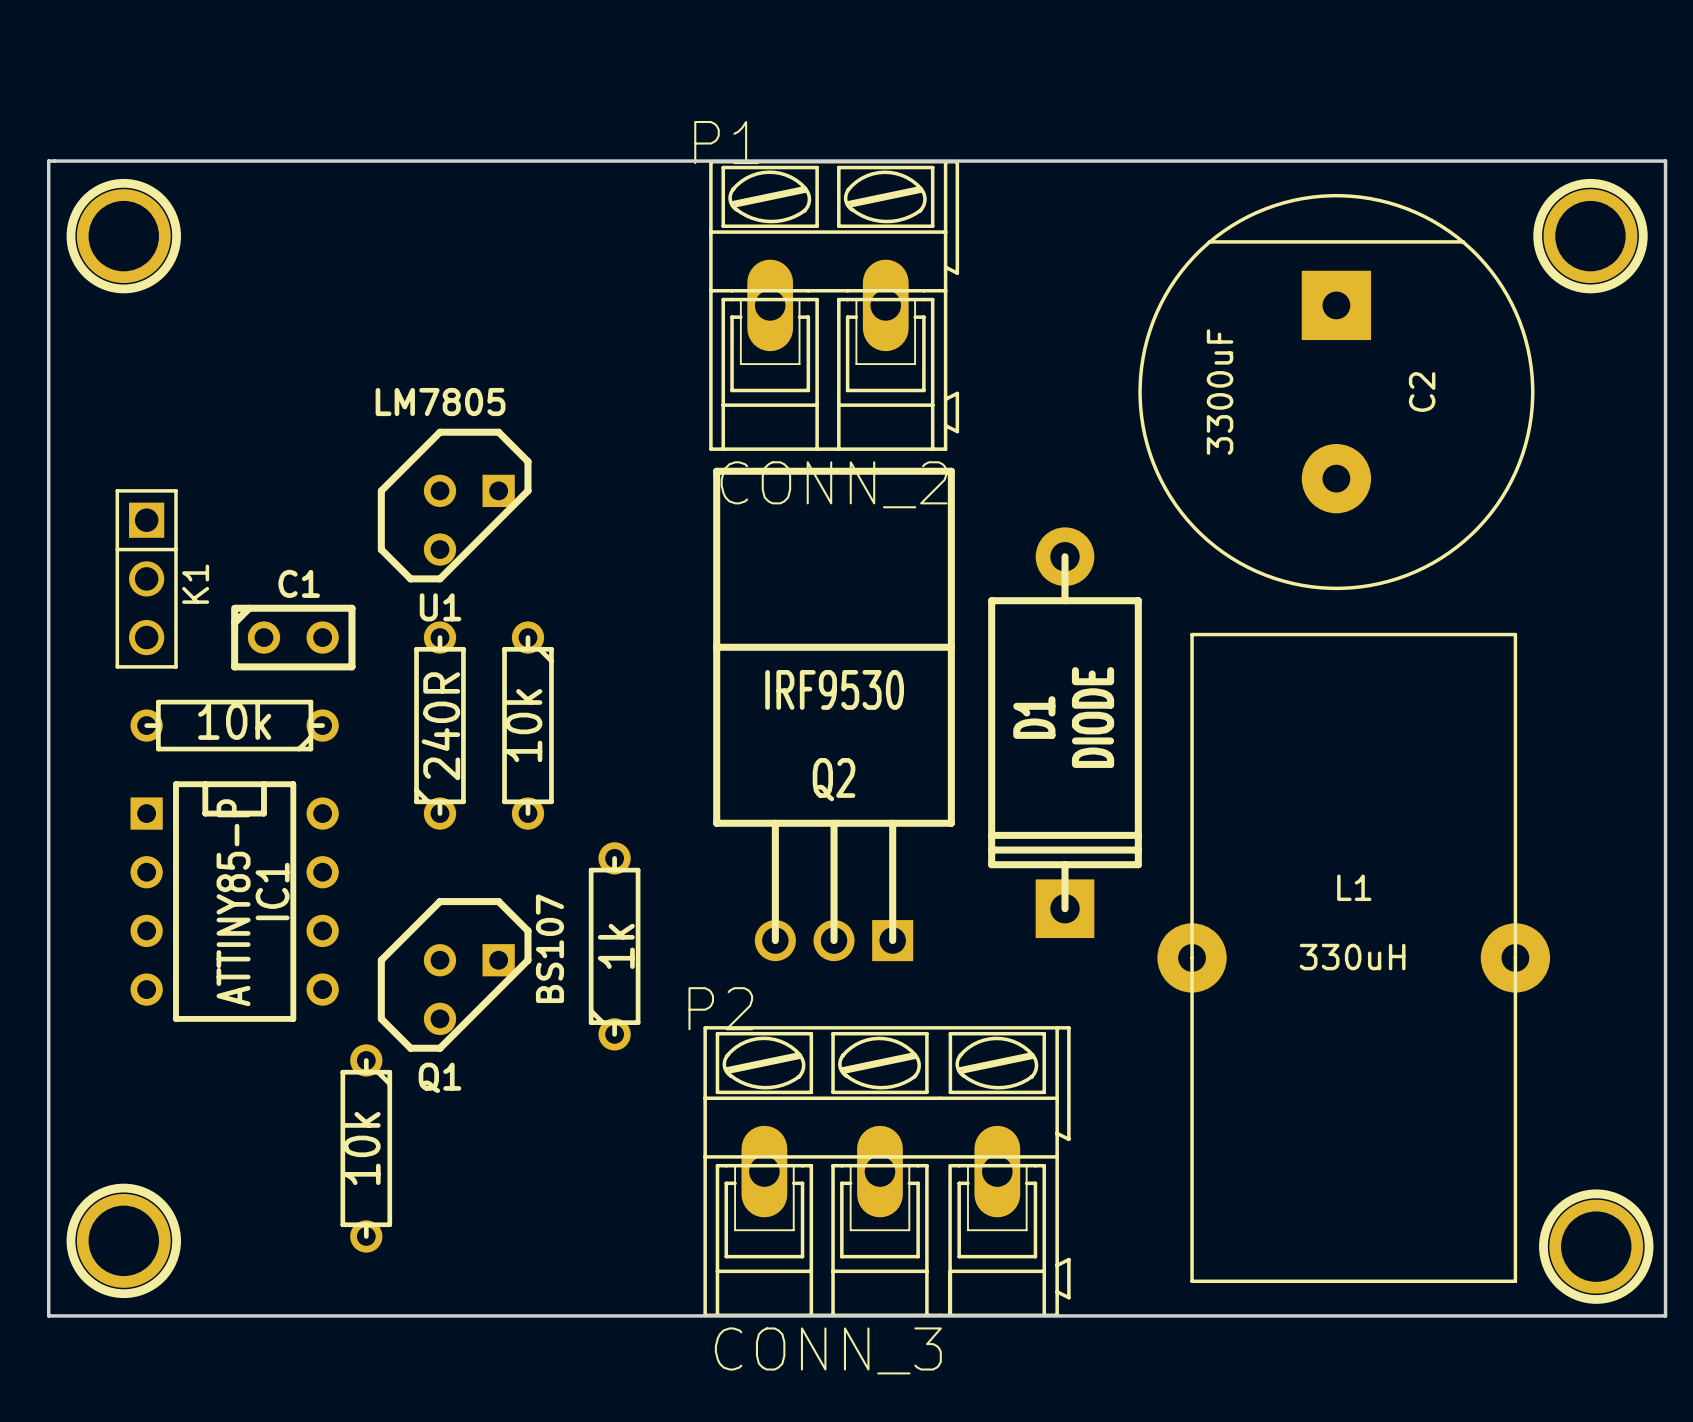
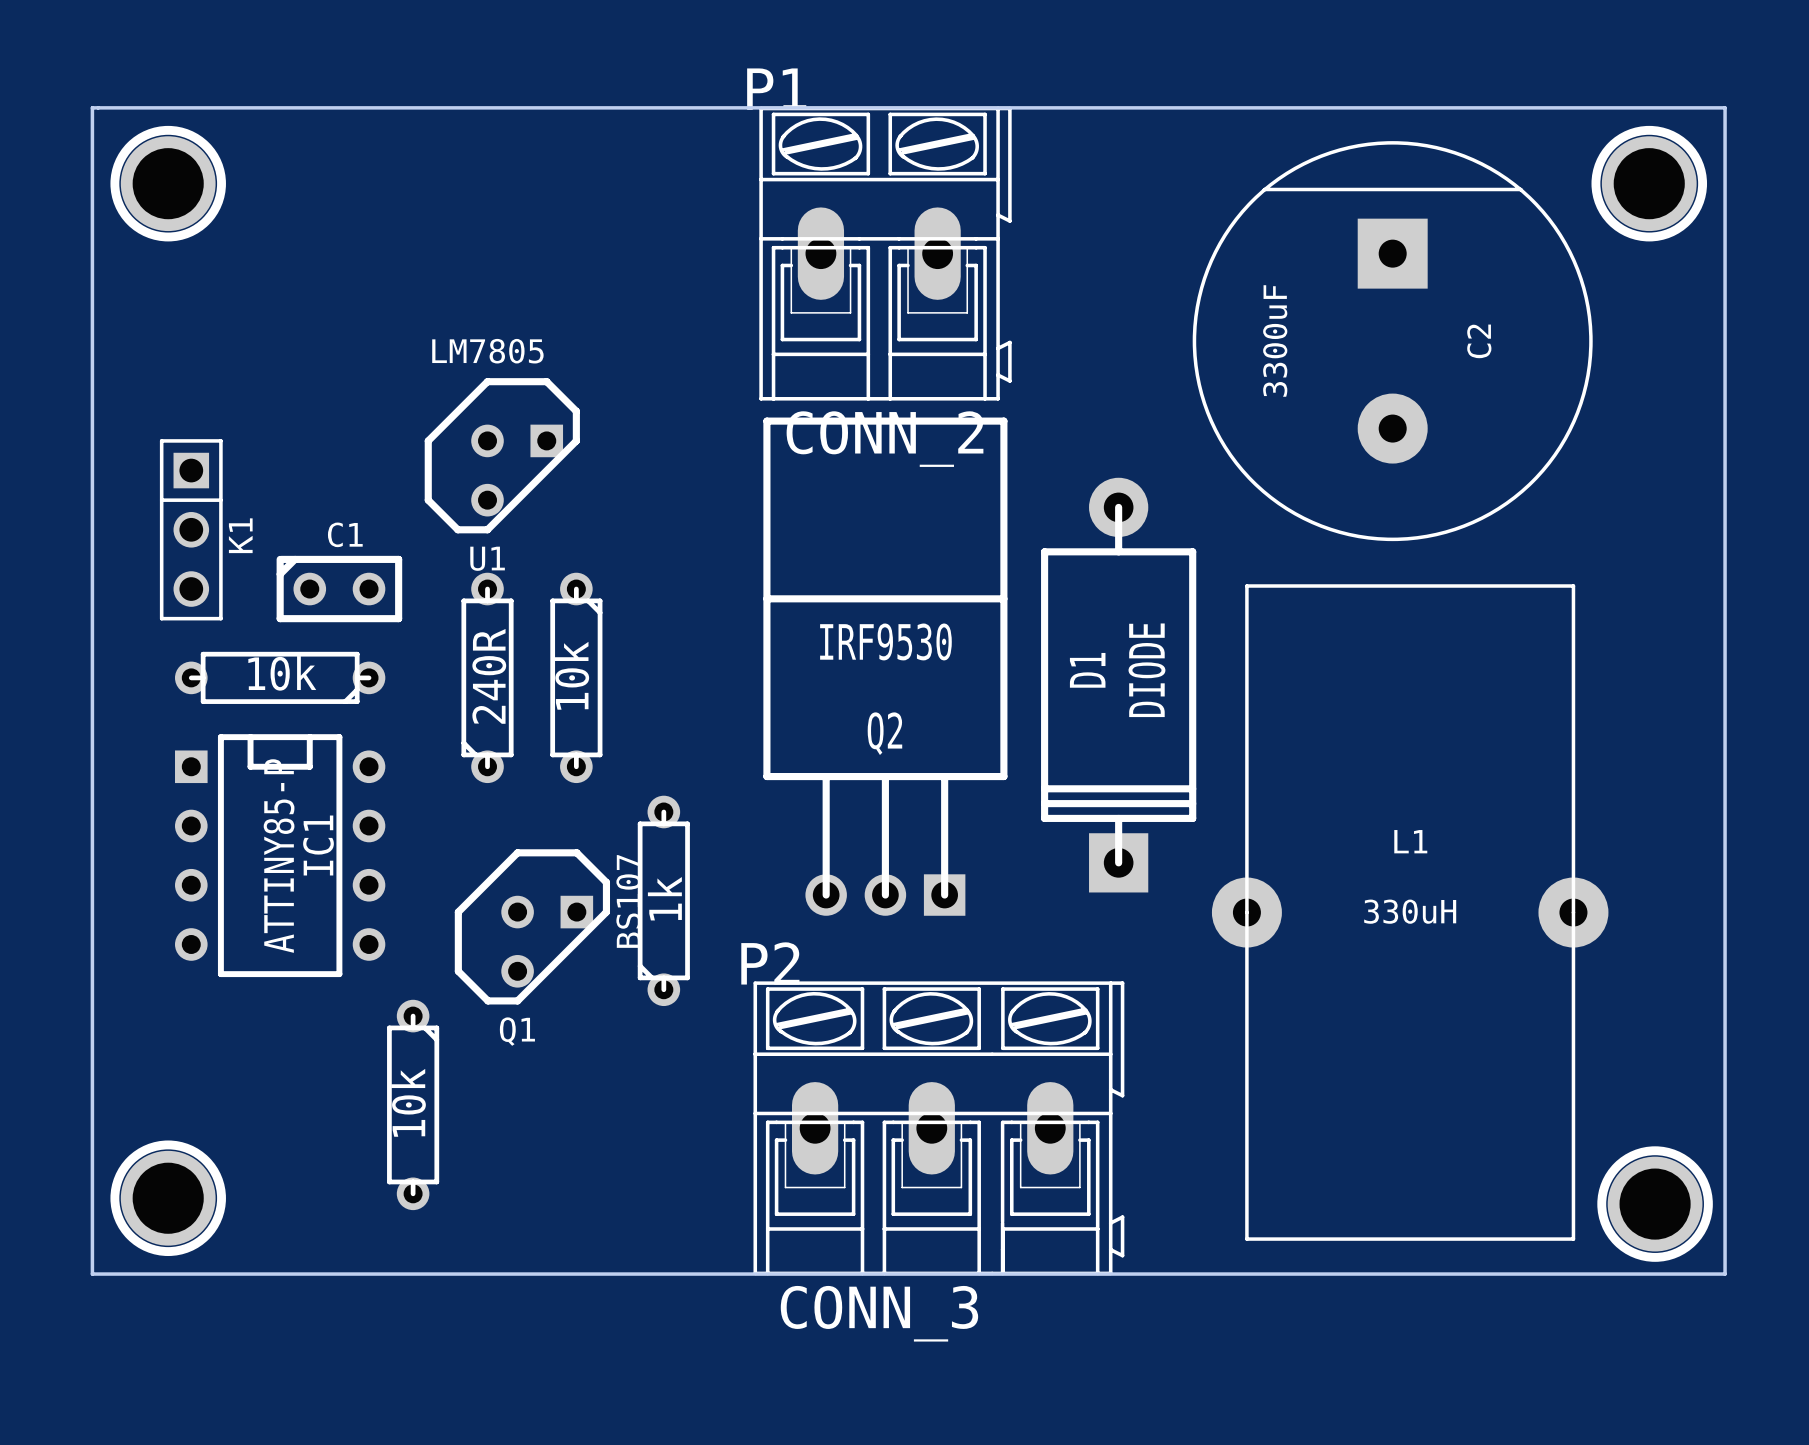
Q1 position: (454, 974) -> (532, 926)

